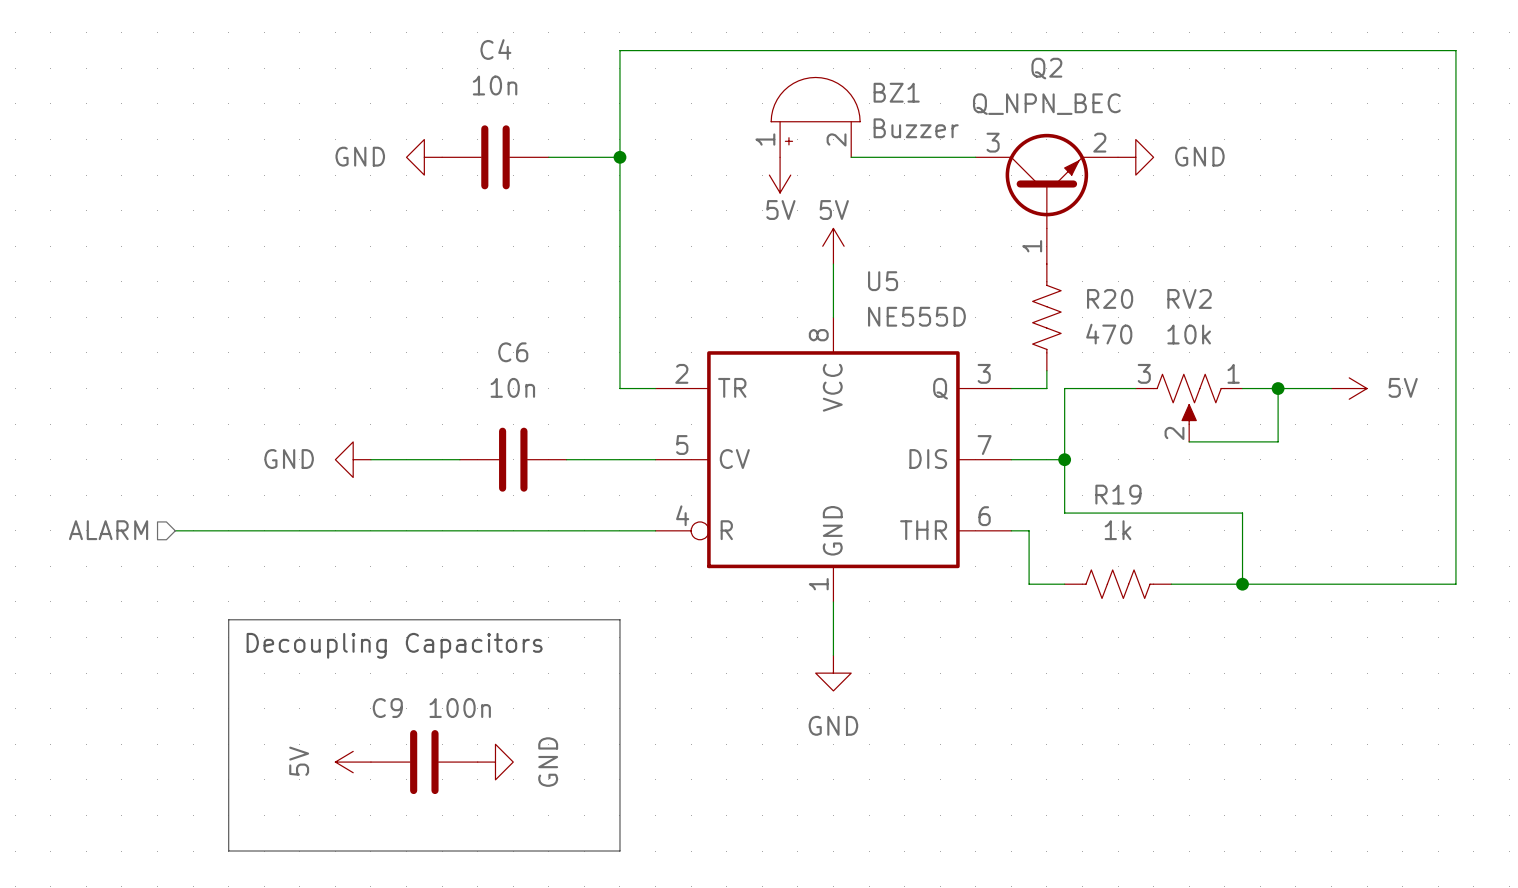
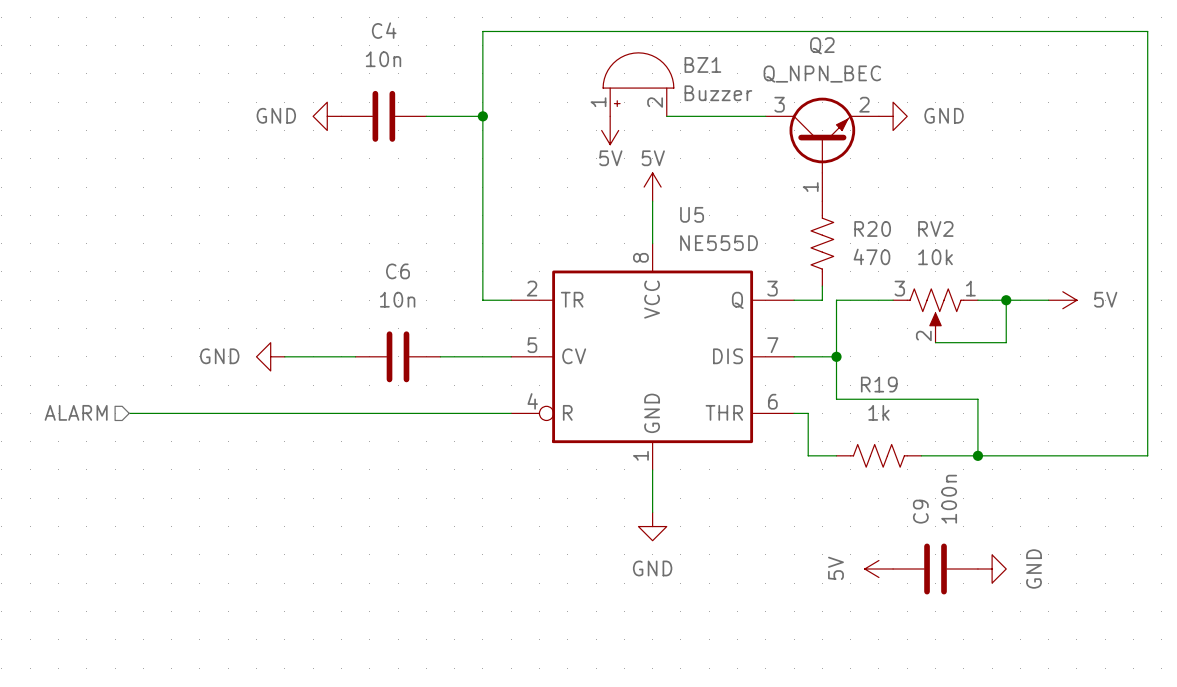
line: (228, 619) (619, 619) (619, 851) (228, 851) (228, 619) -> none
text: Decoupling Capacitors (394, 645) -> none
C9 name rotation: 0° (387, 708) -> 90° counterclockwise (920, 511)
C9 value rotation: 0° (460, 708) -> 90° counterclockwise (949, 499)
power symbol: none -> 5V (878, 569)
power symbol: none -> GND (992, 569)
power symbol: 5V (353, 762) -> none
C9 position: (424, 762) -> (935, 569)
power symbol: GND (495, 762) -> none

